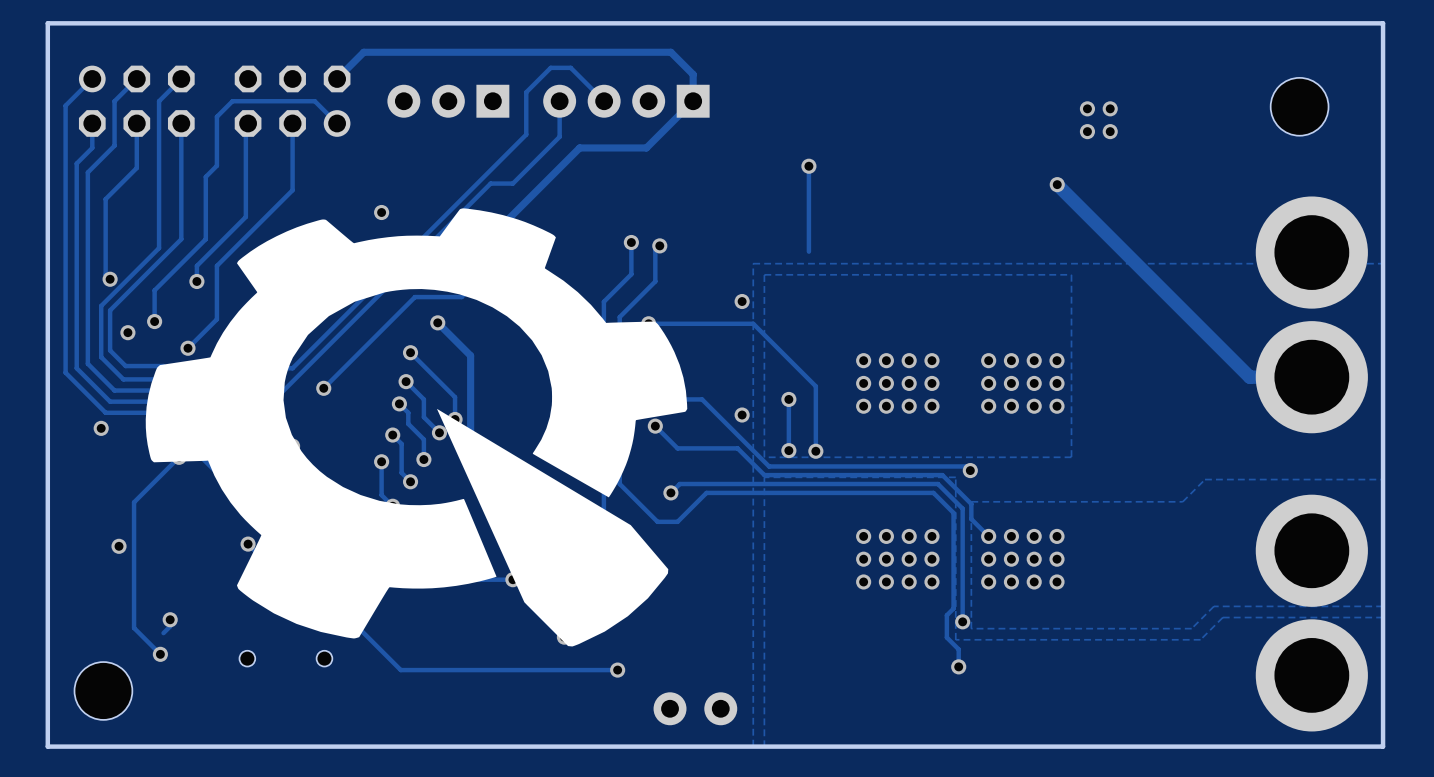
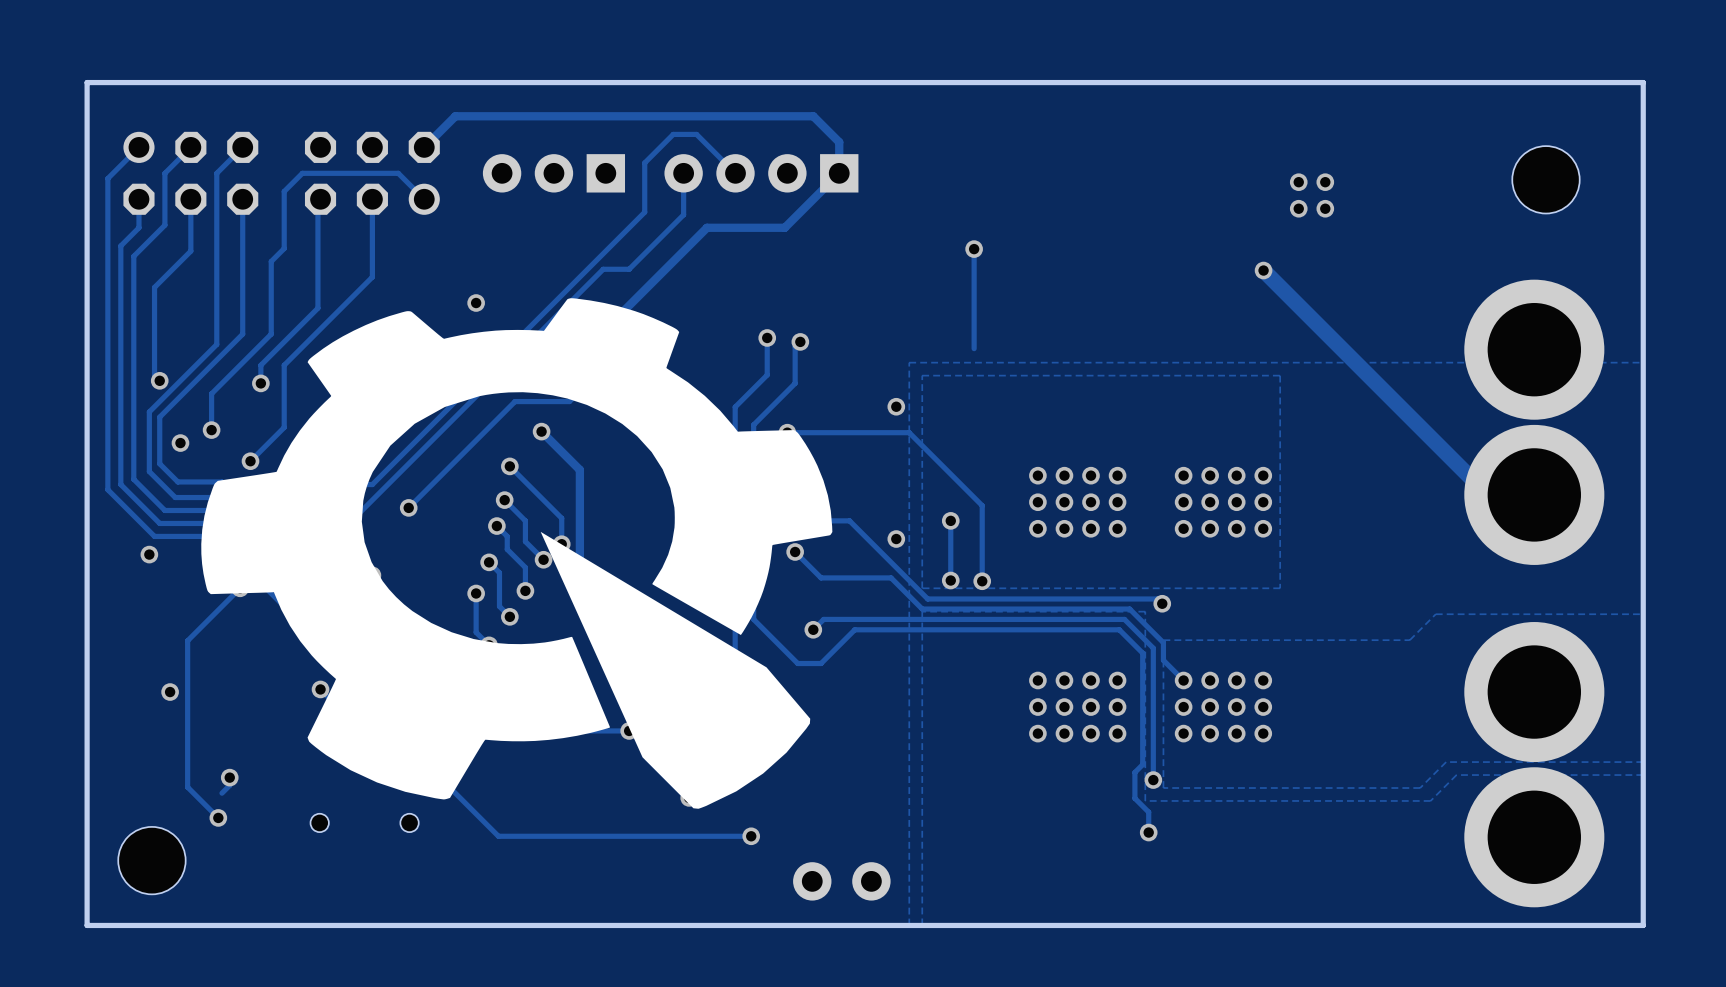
part: none -> (1534, 422)
part: (1311, 314) -> none
part: none -> (1534, 764)
part: (1311, 613) -> none

